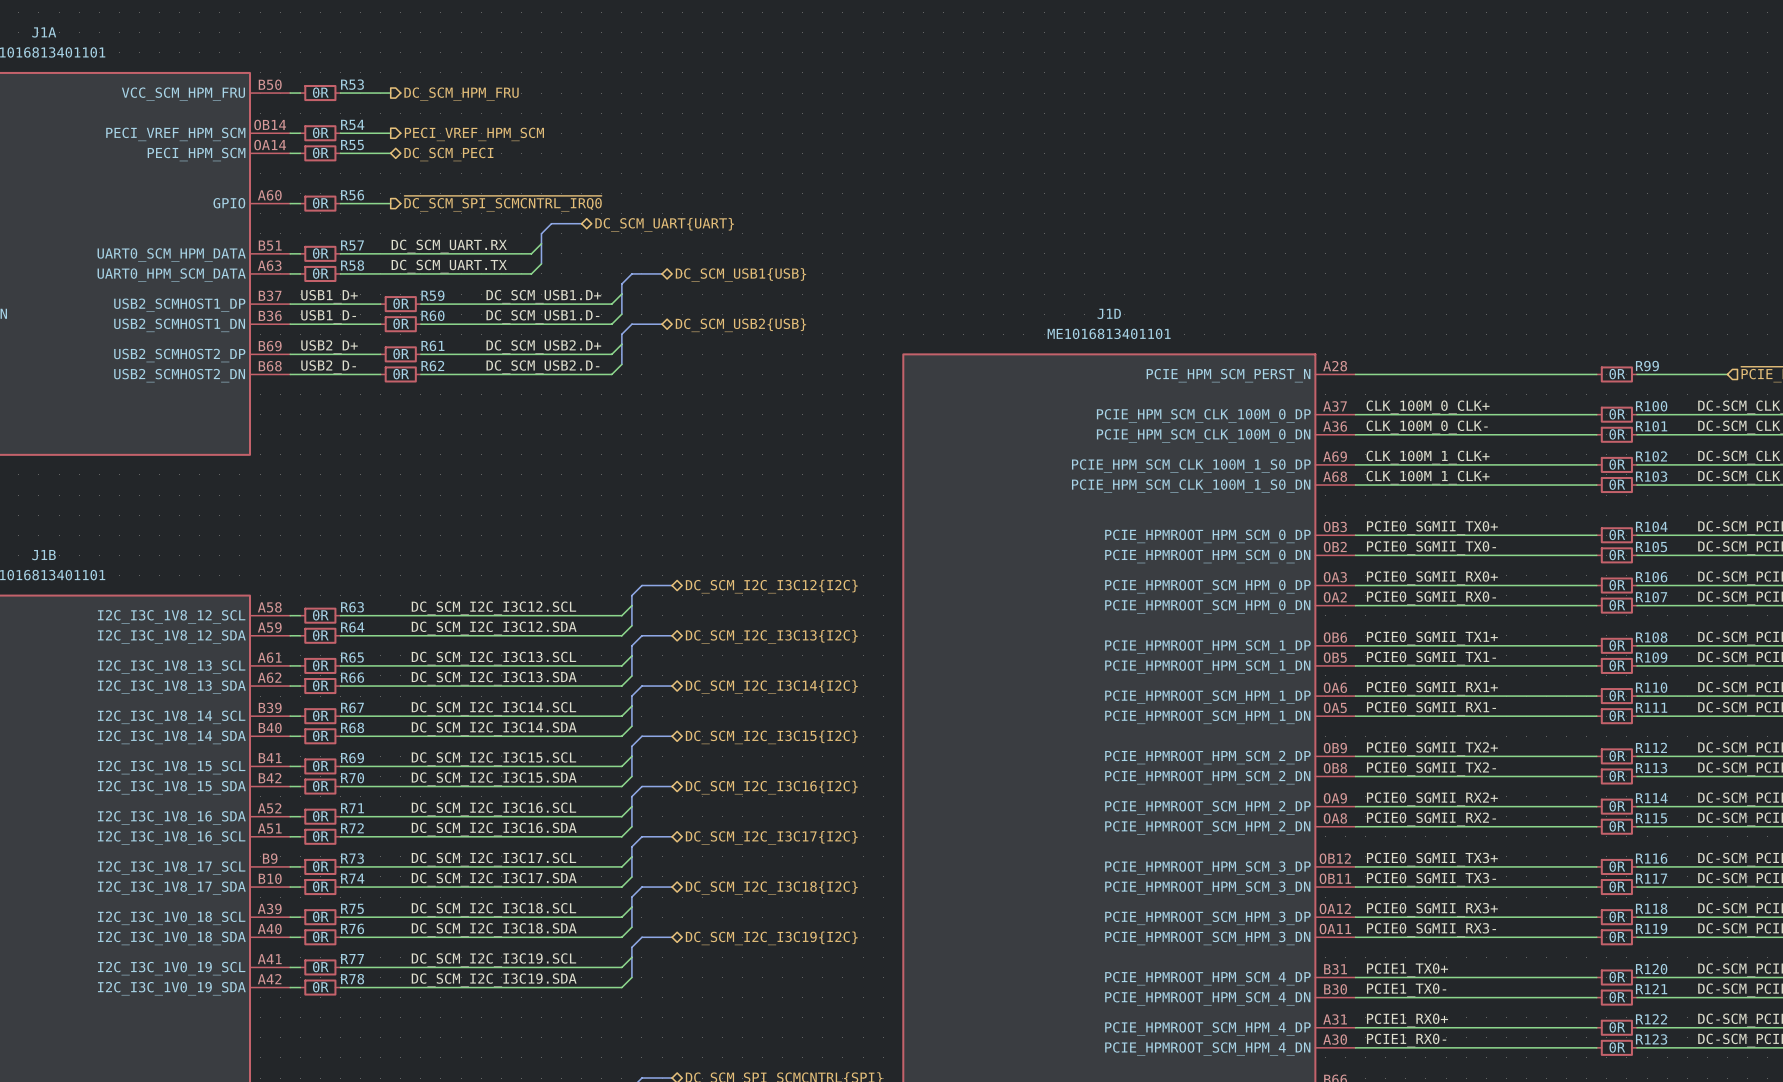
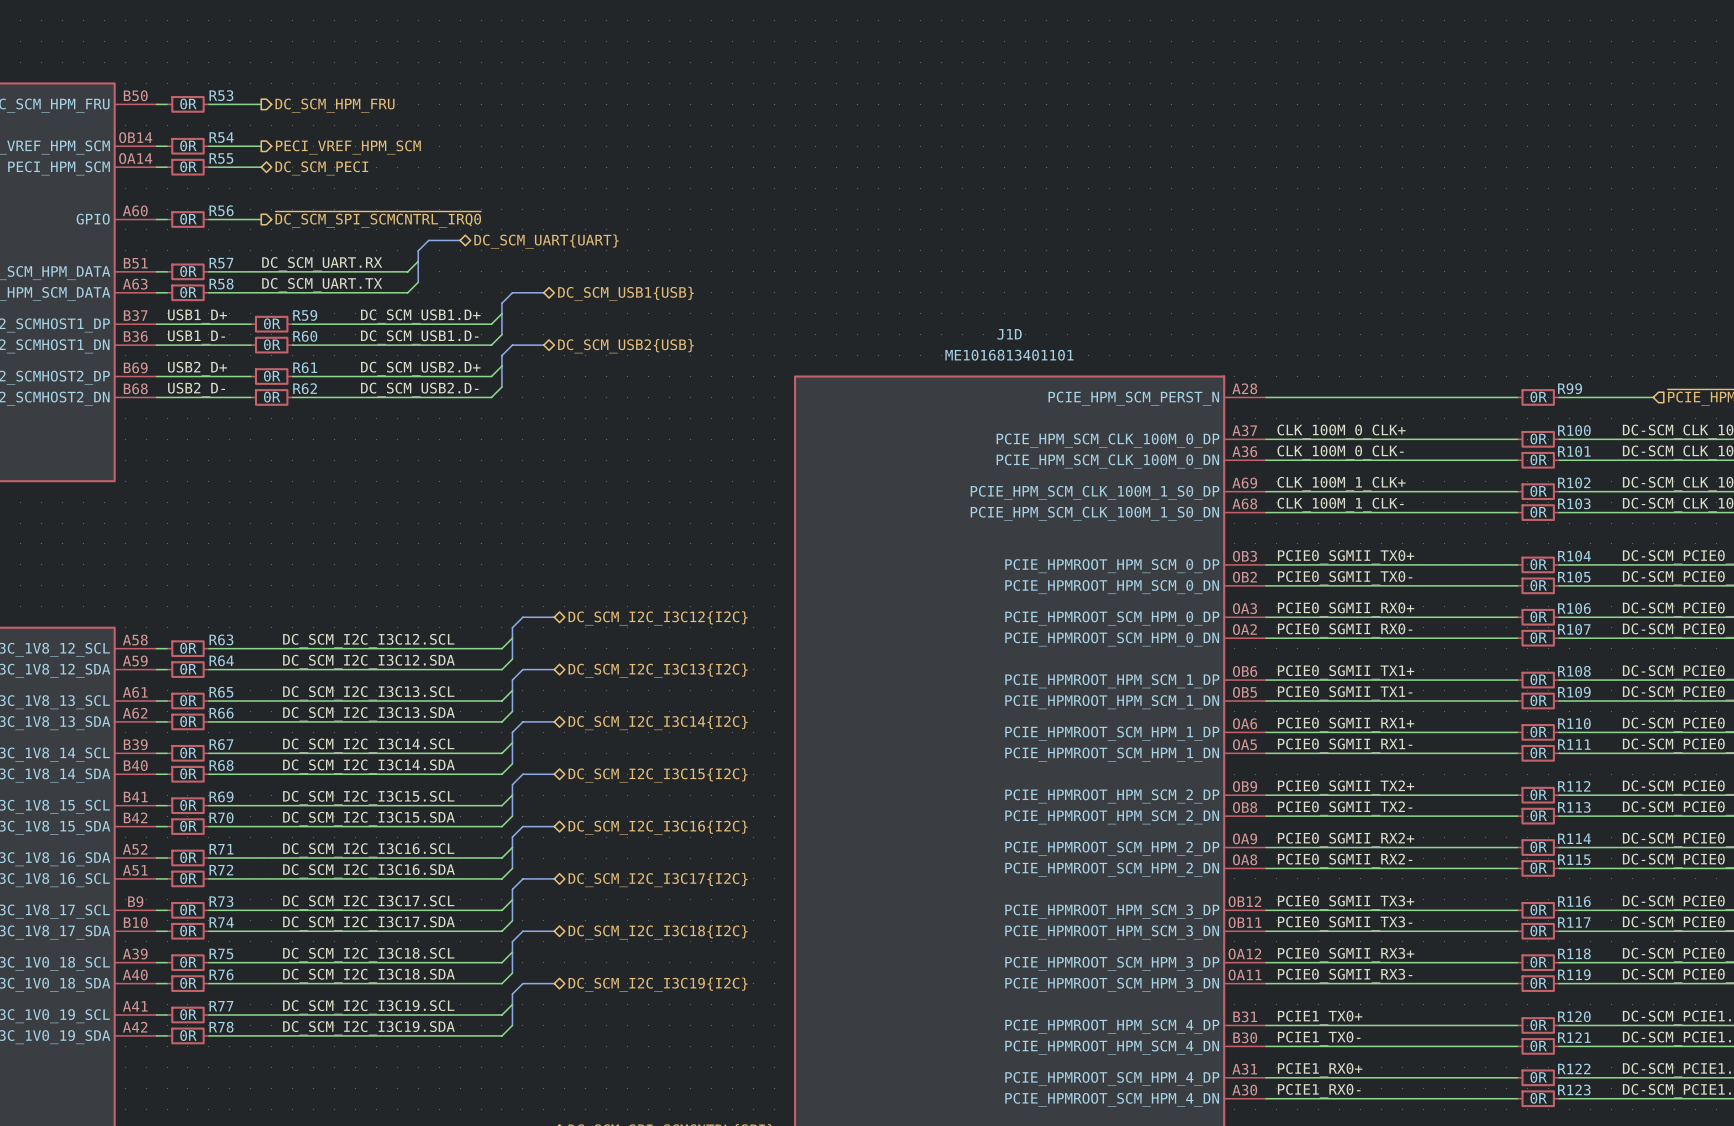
label: CLK_100M_1_CLK+ (1428, 477) -> CLK_100M_1_CLK- (1340, 504)

